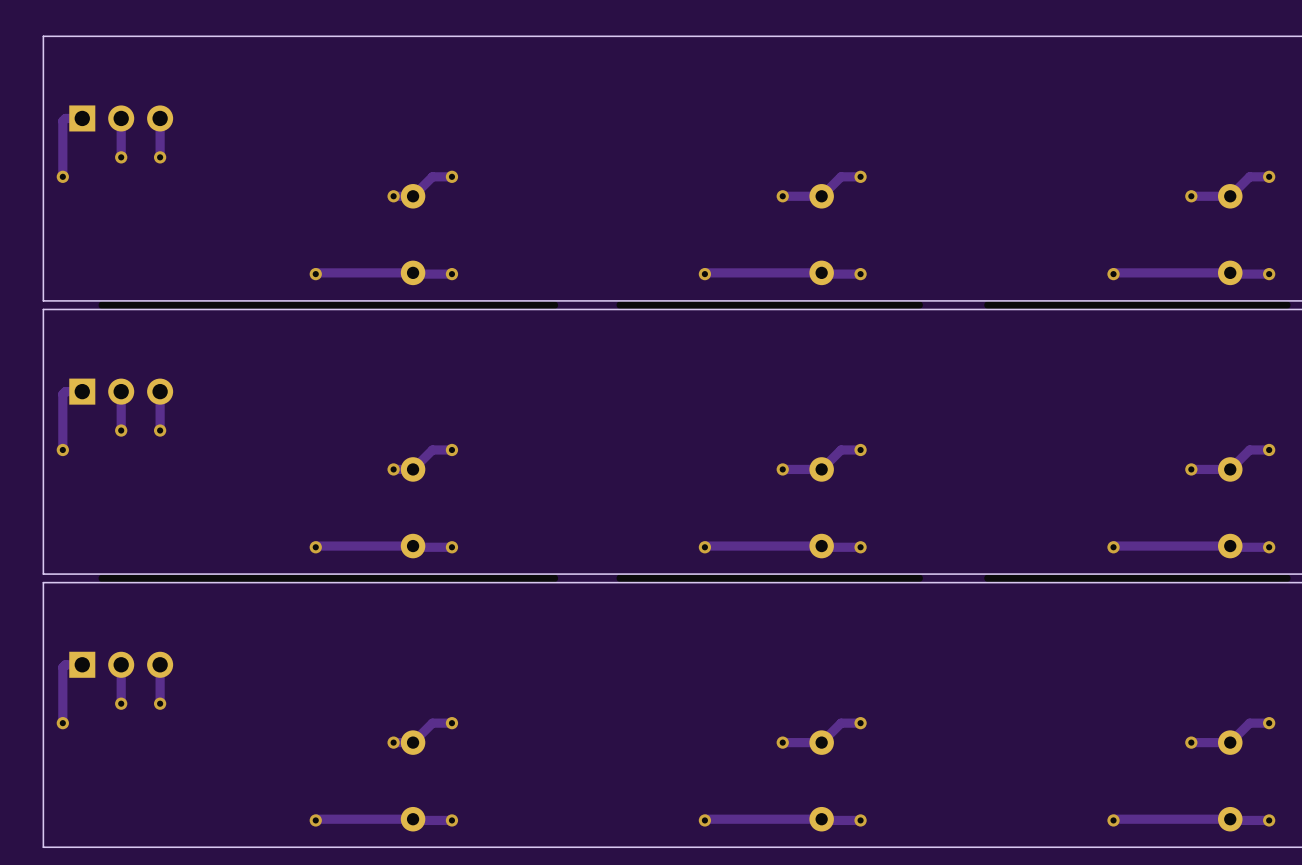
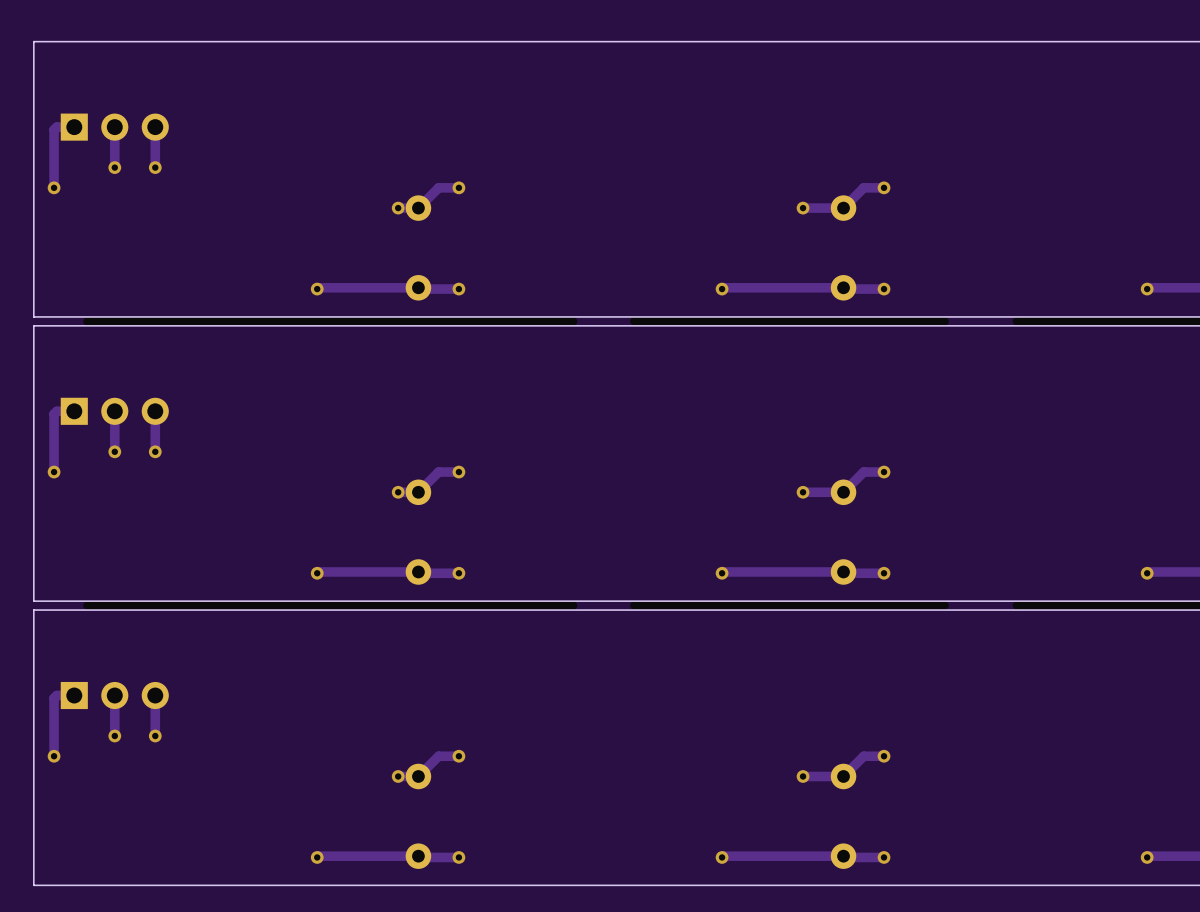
part footprint: [98, 301, 559, 310] -> [83, 317, 578, 326]
part footprint: [98, 574, 559, 583] -> [83, 601, 578, 610]

